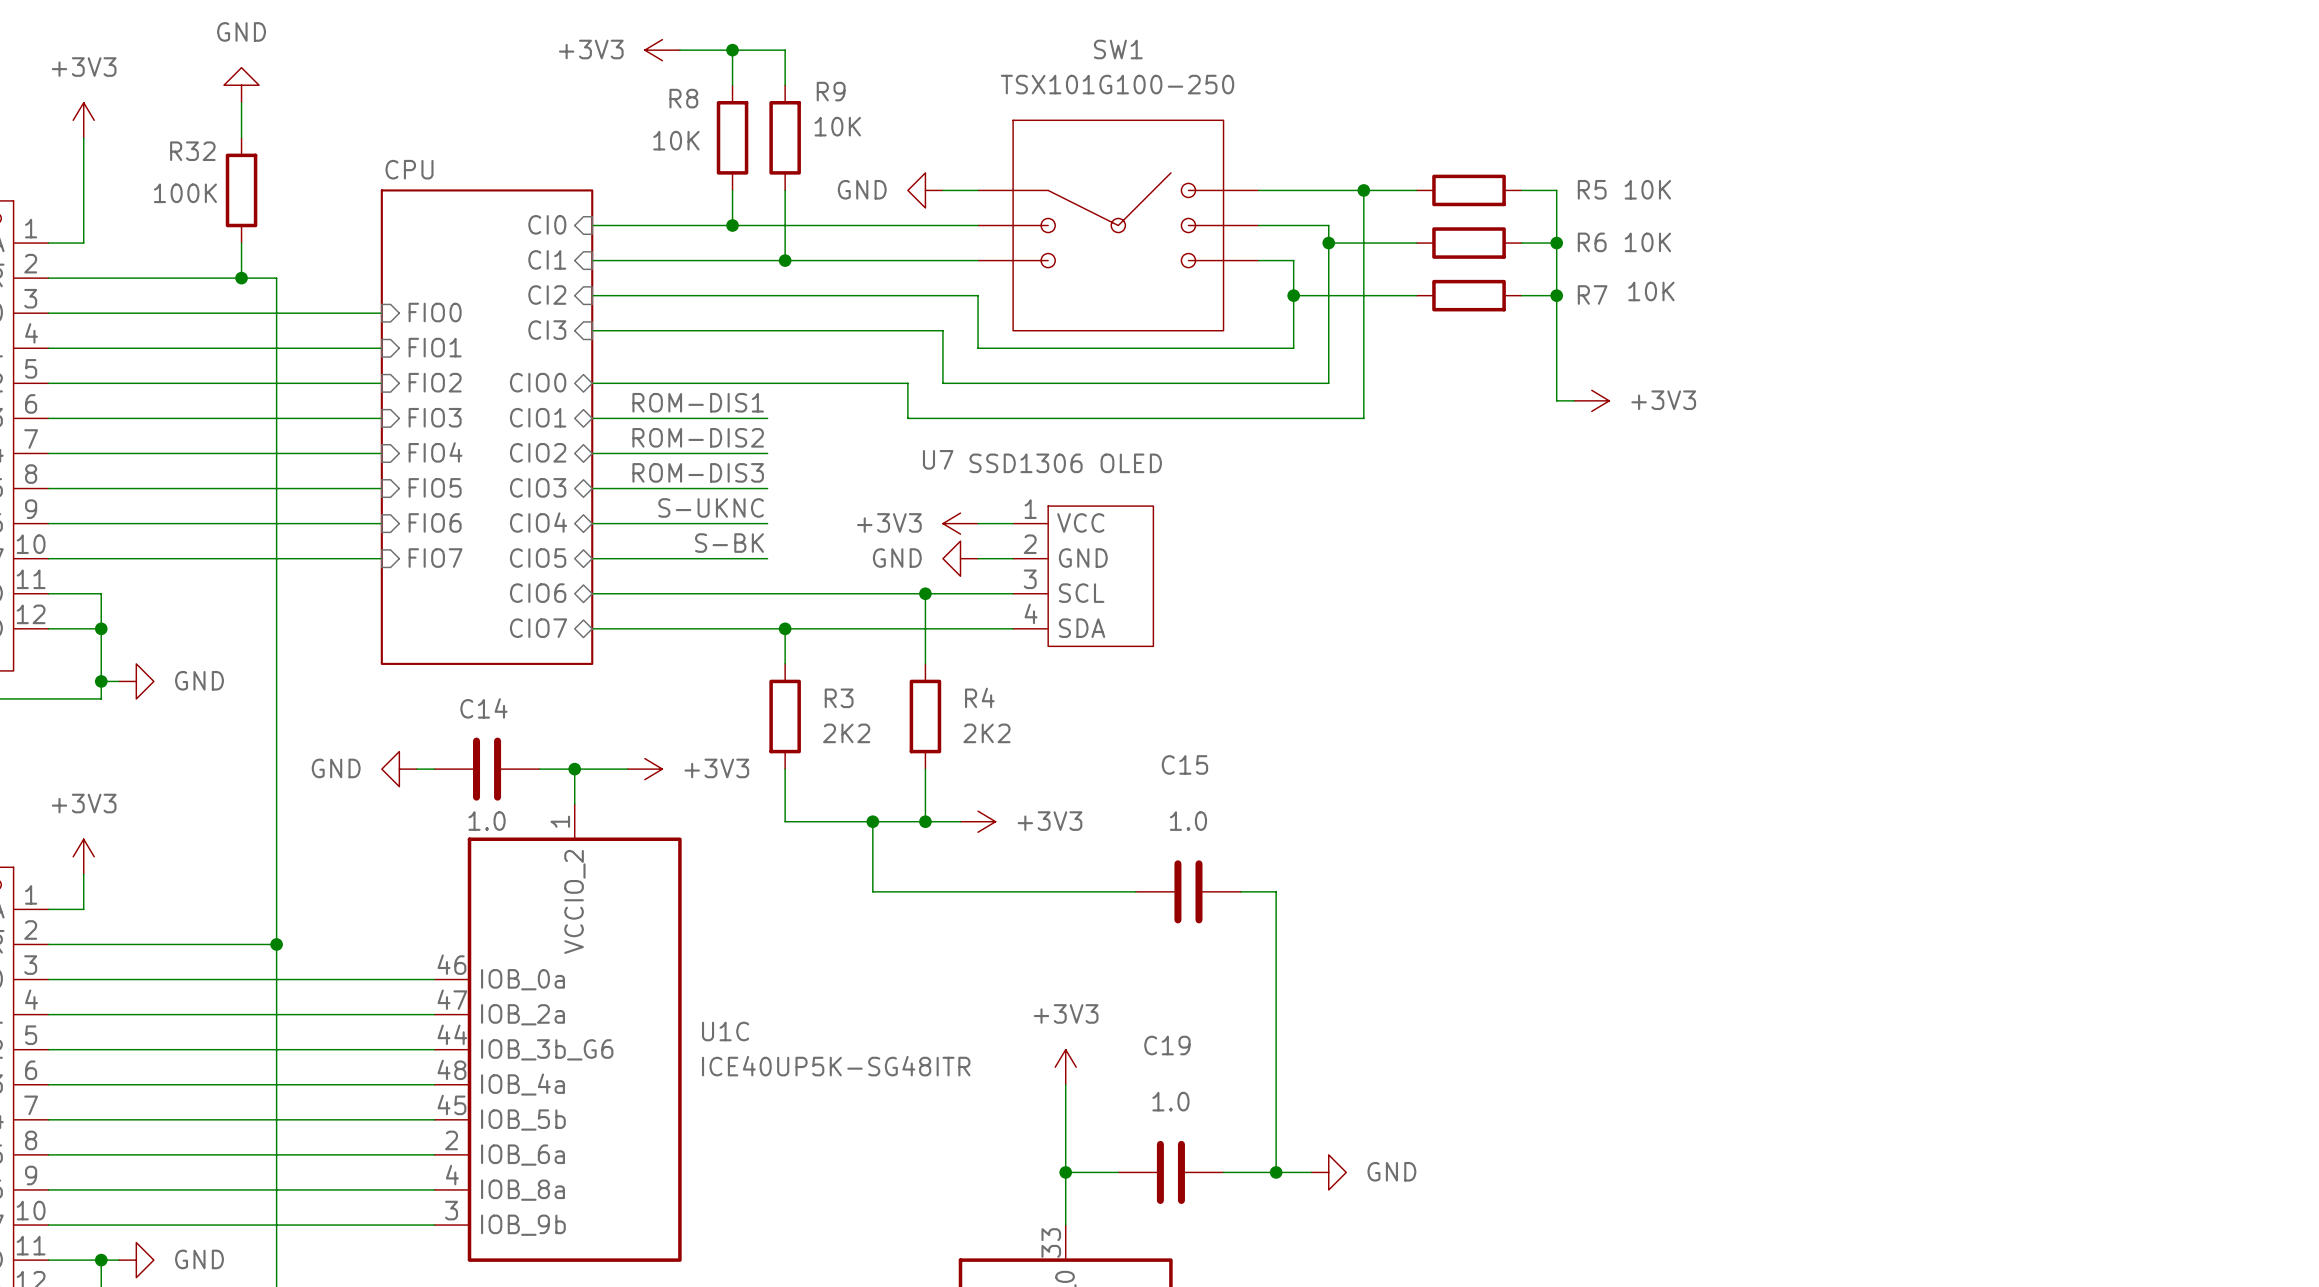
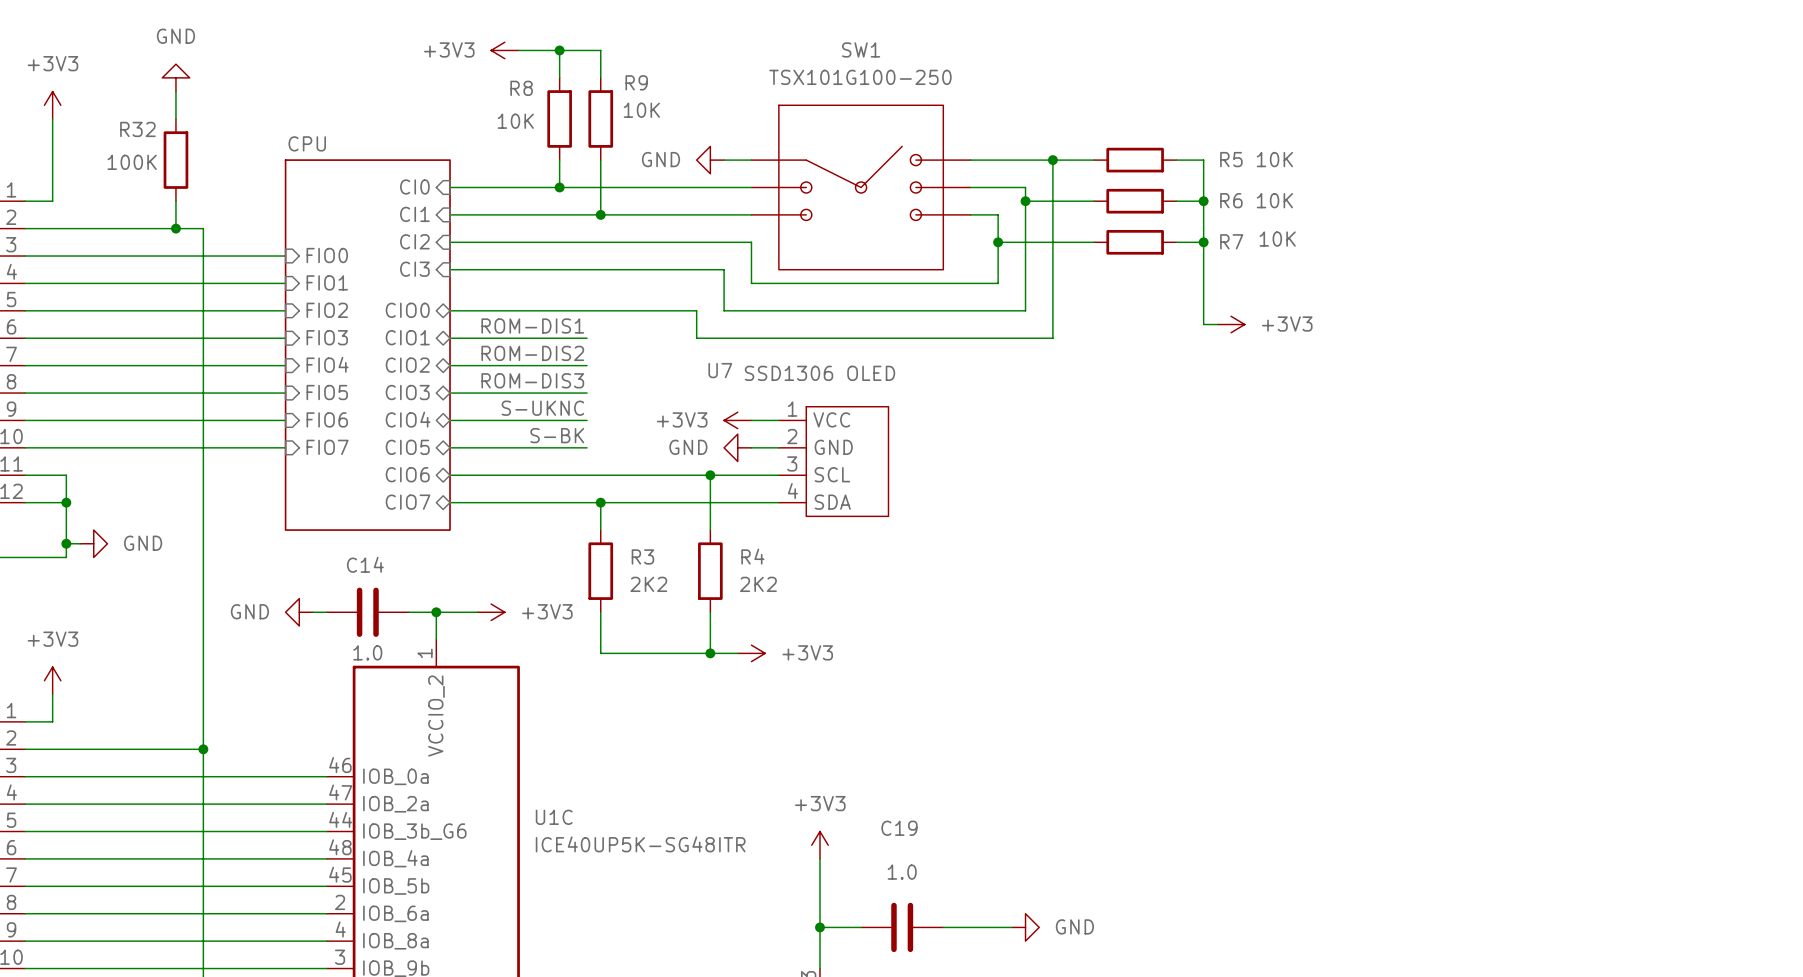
wire: (872, 821) (872, 891) (1135, 891) -> none
junction: (872, 821) -> none
C15: 1.0 (1188, 891) -> none
wire: (1241, 891) (1276, 891) (1276, 1172) -> none
junction: (1276, 1172) -> none

